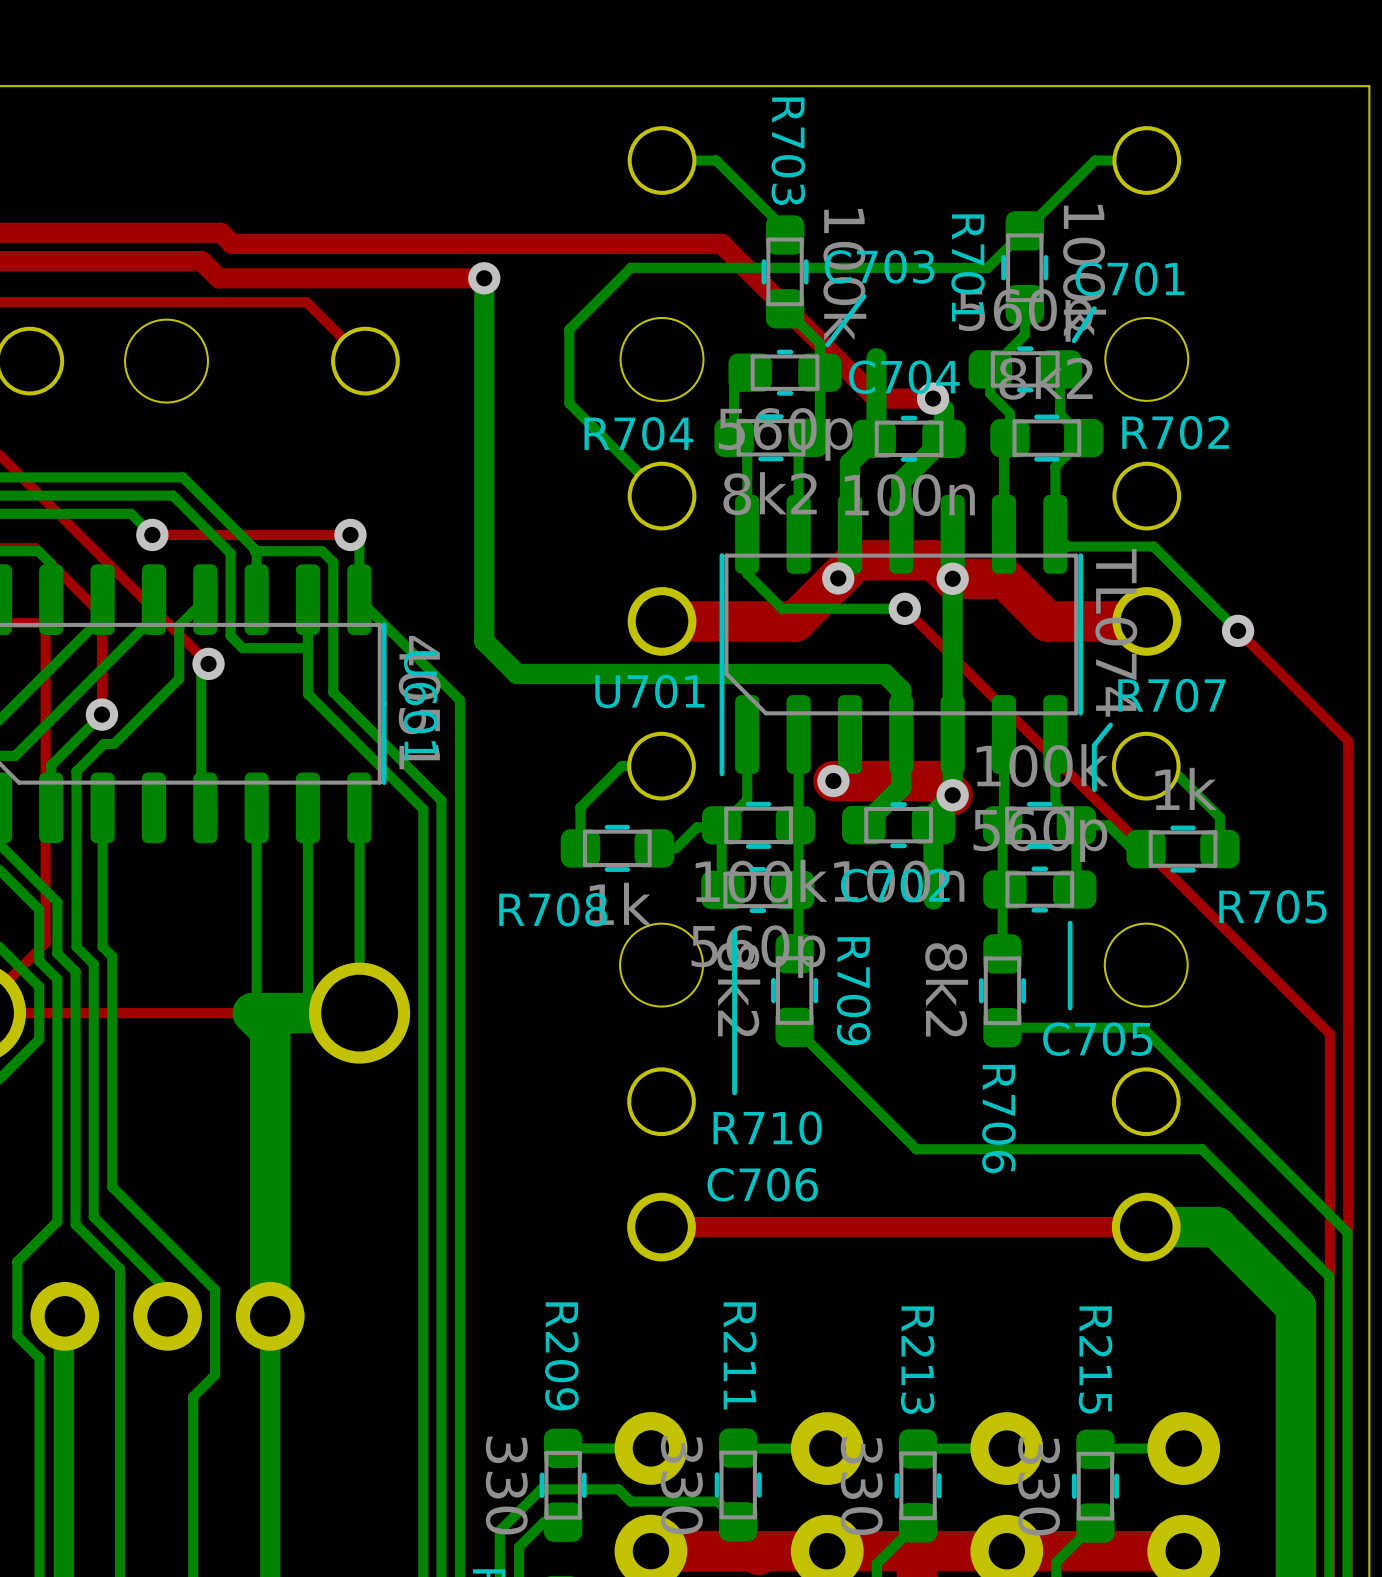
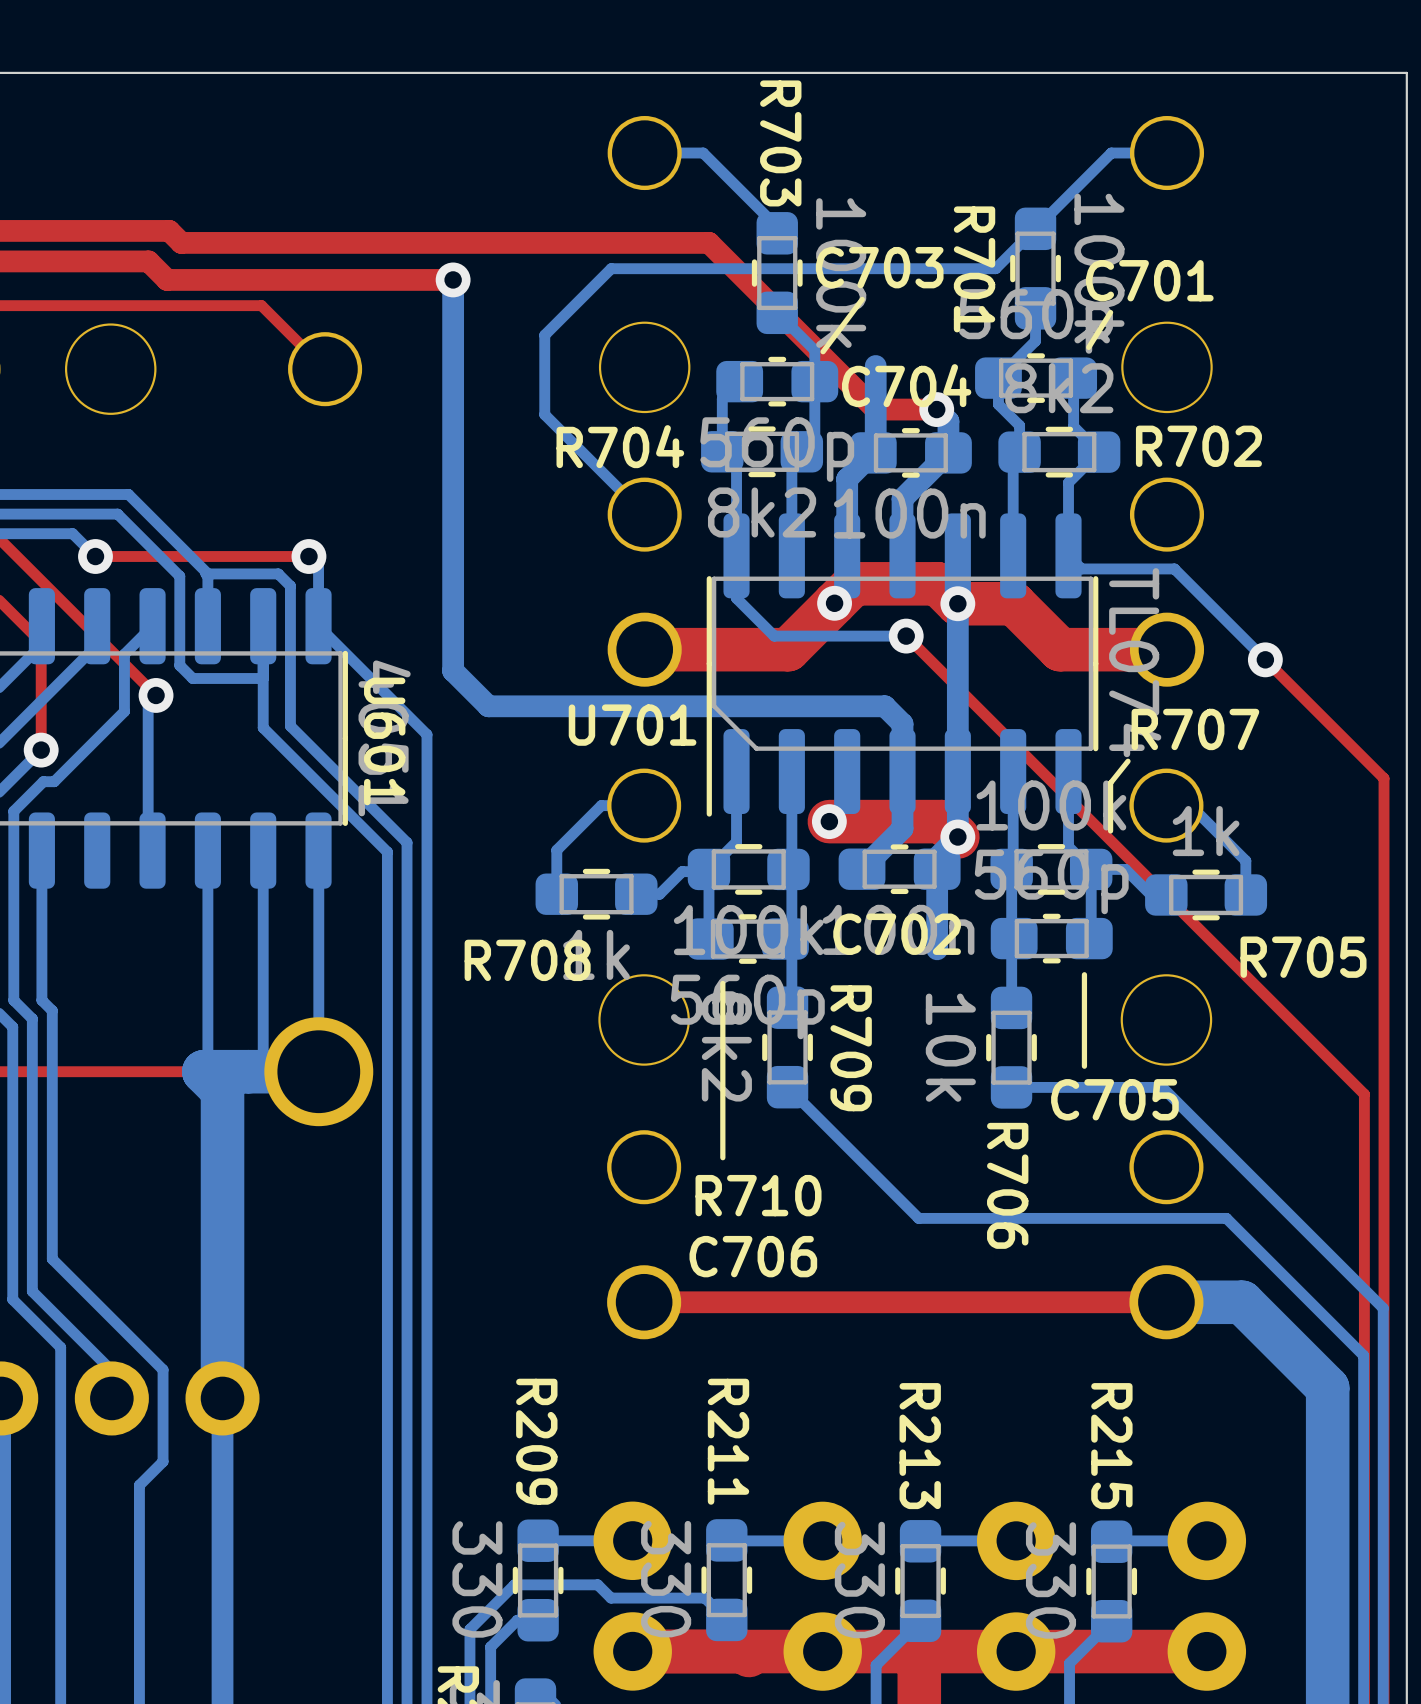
R706 value: 8k2 (946, 989) -> 10k (950, 1047)

